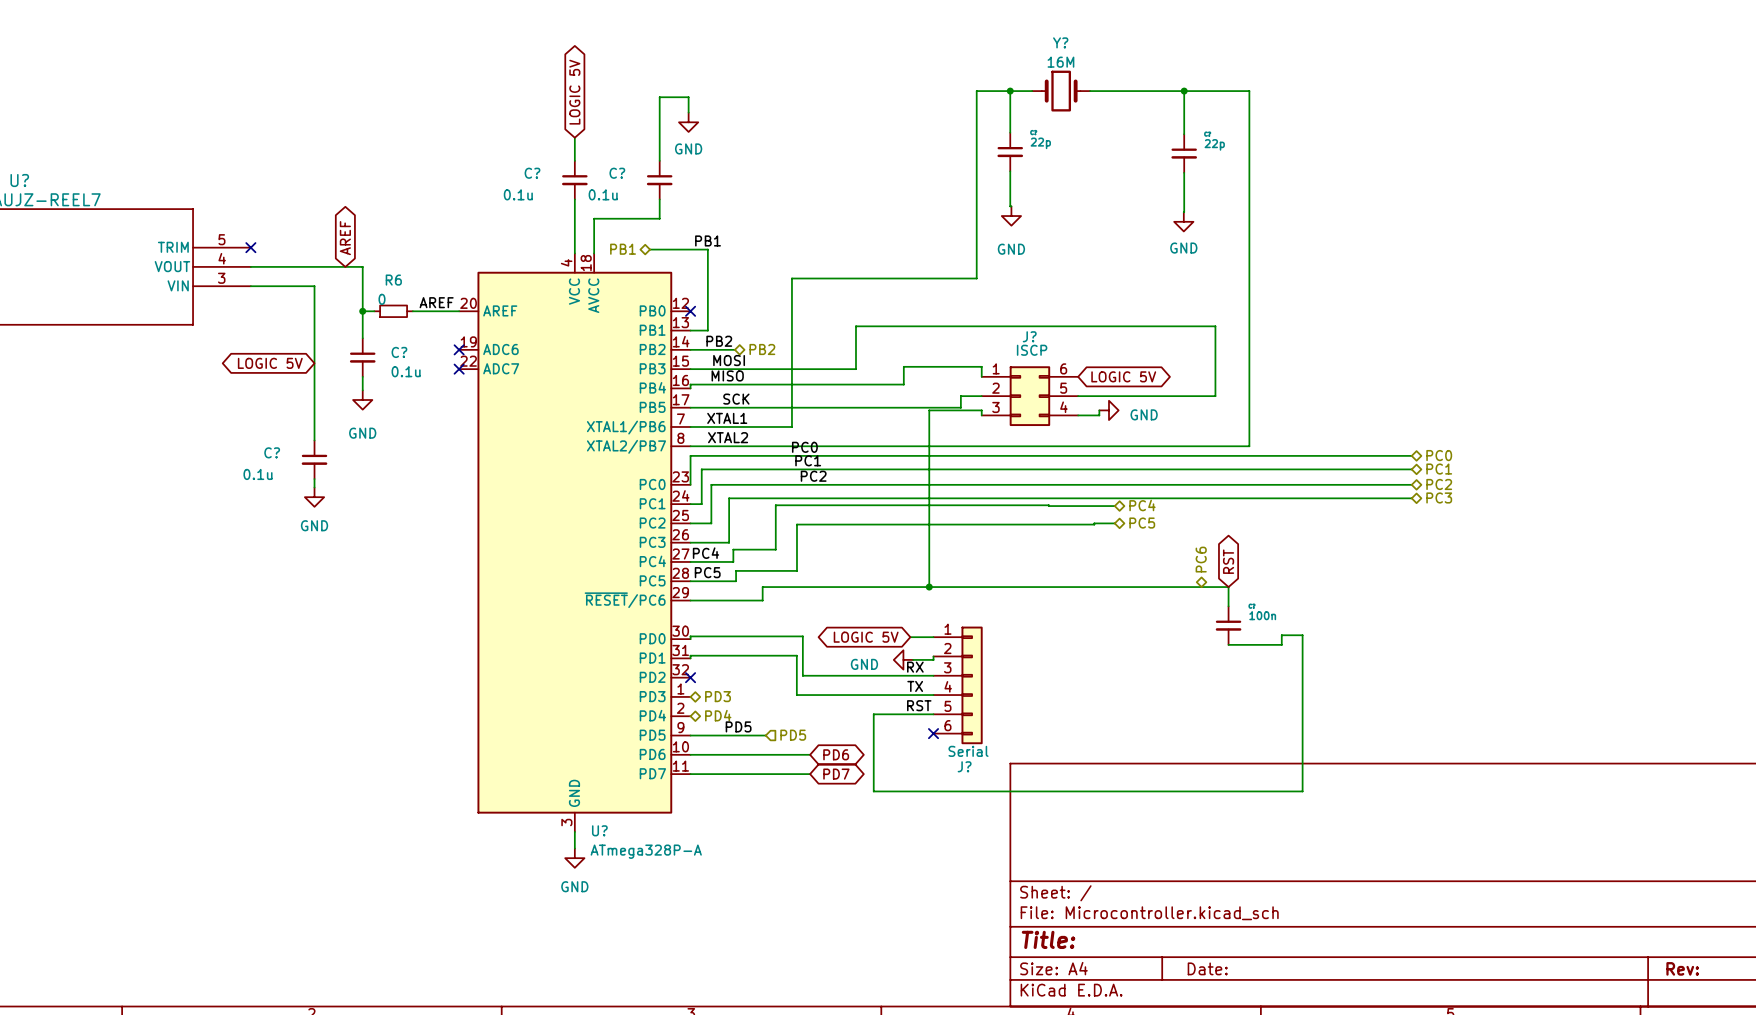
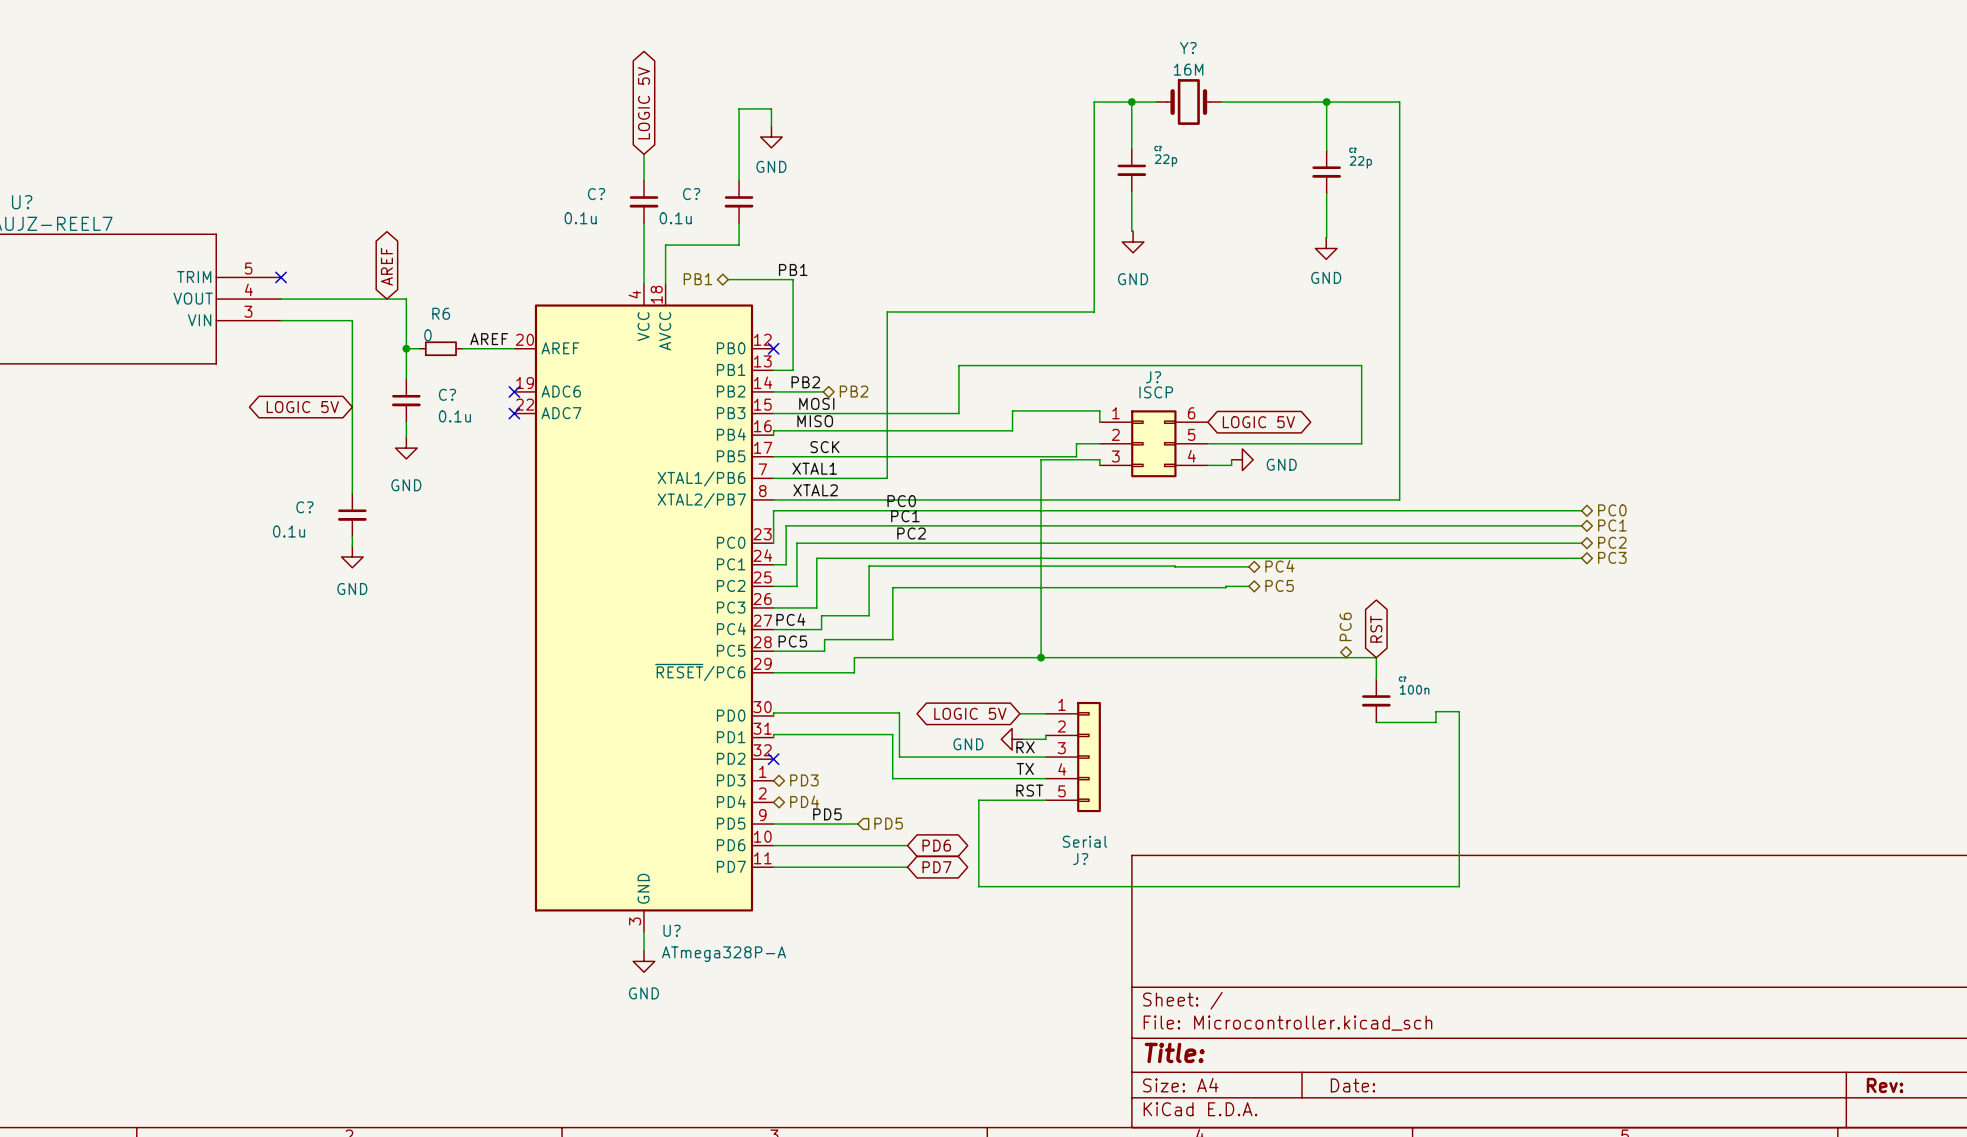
J?: none -> Serial (1073, 757)
J?: Serial (958, 685) -> none
no-connect mark: (933, 733) -> none

